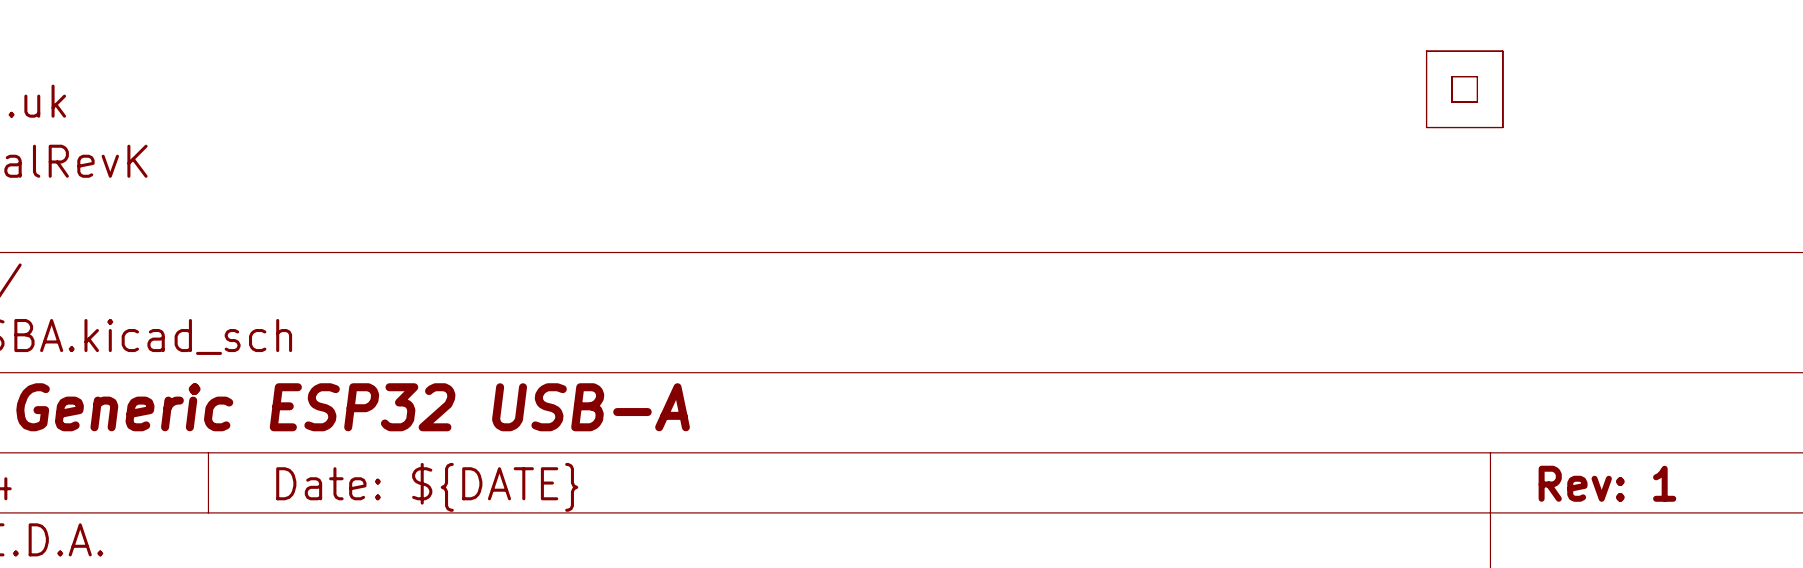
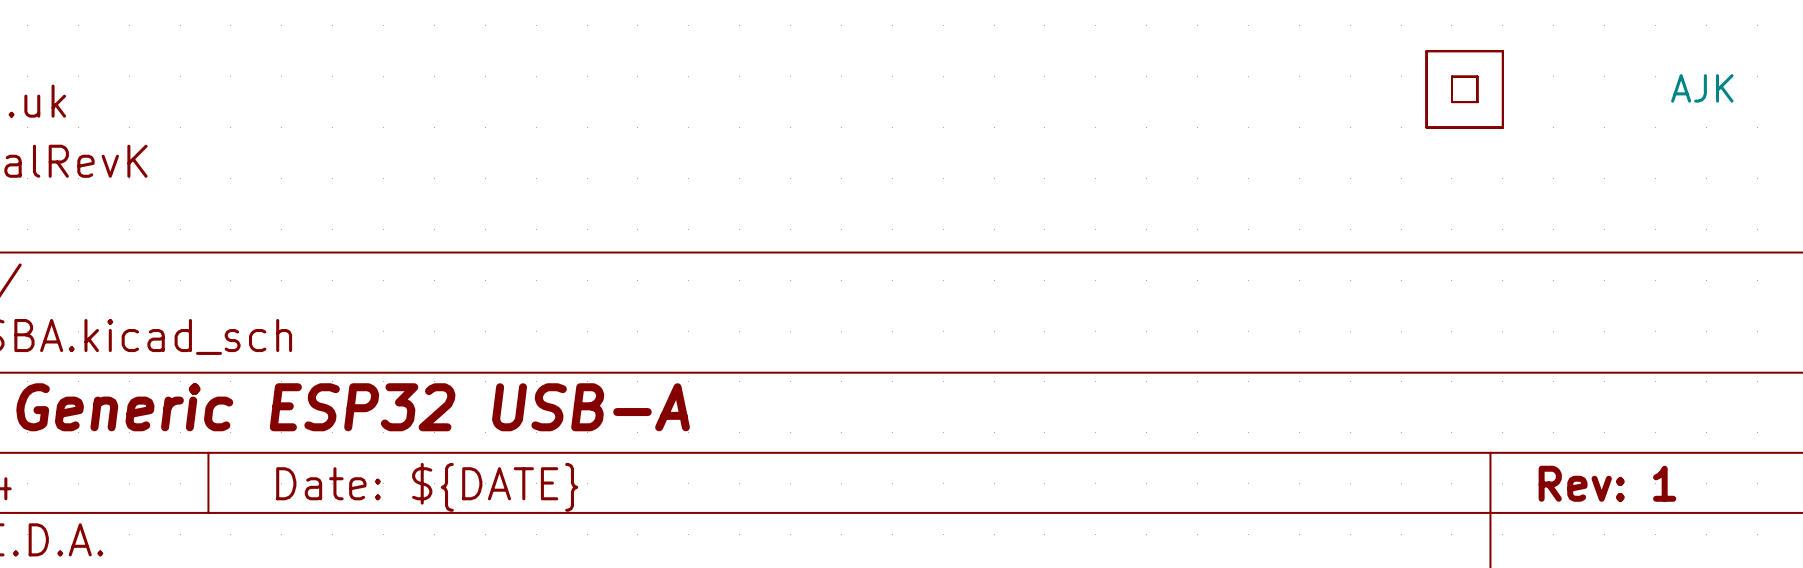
part: none -> AJK (1702, 88)

